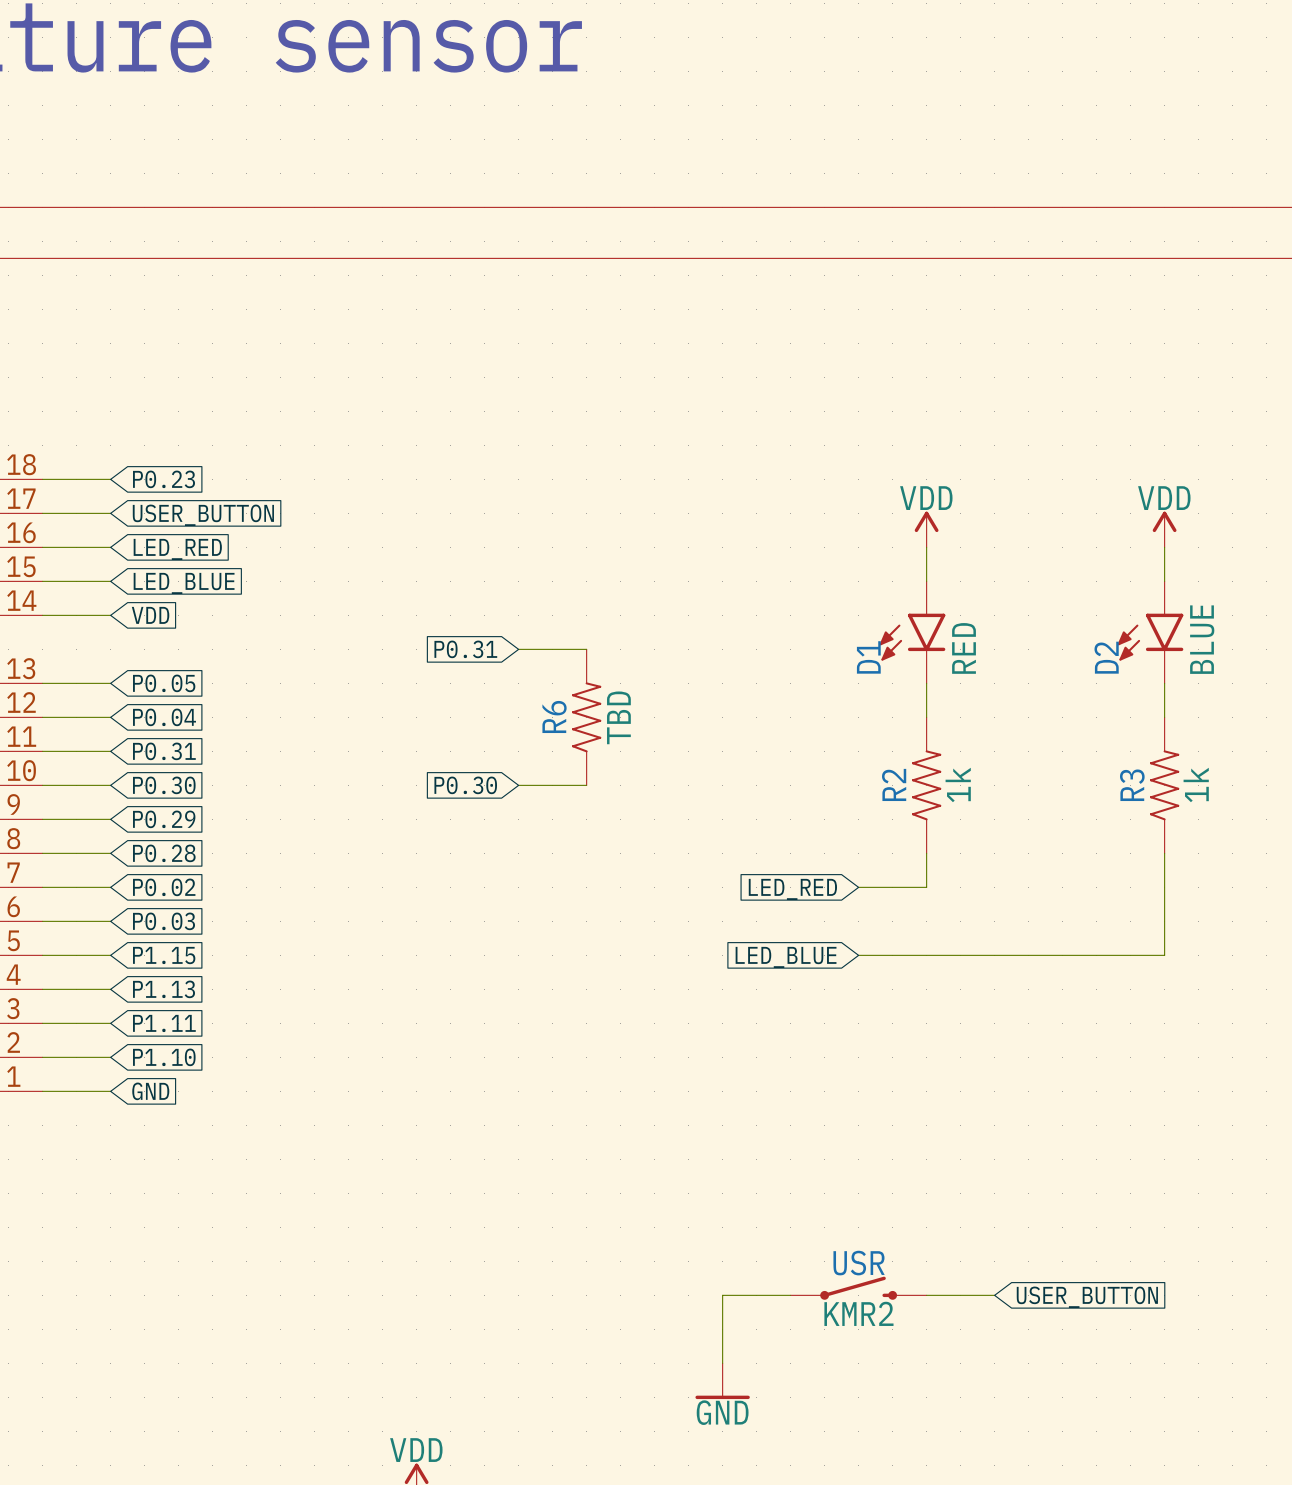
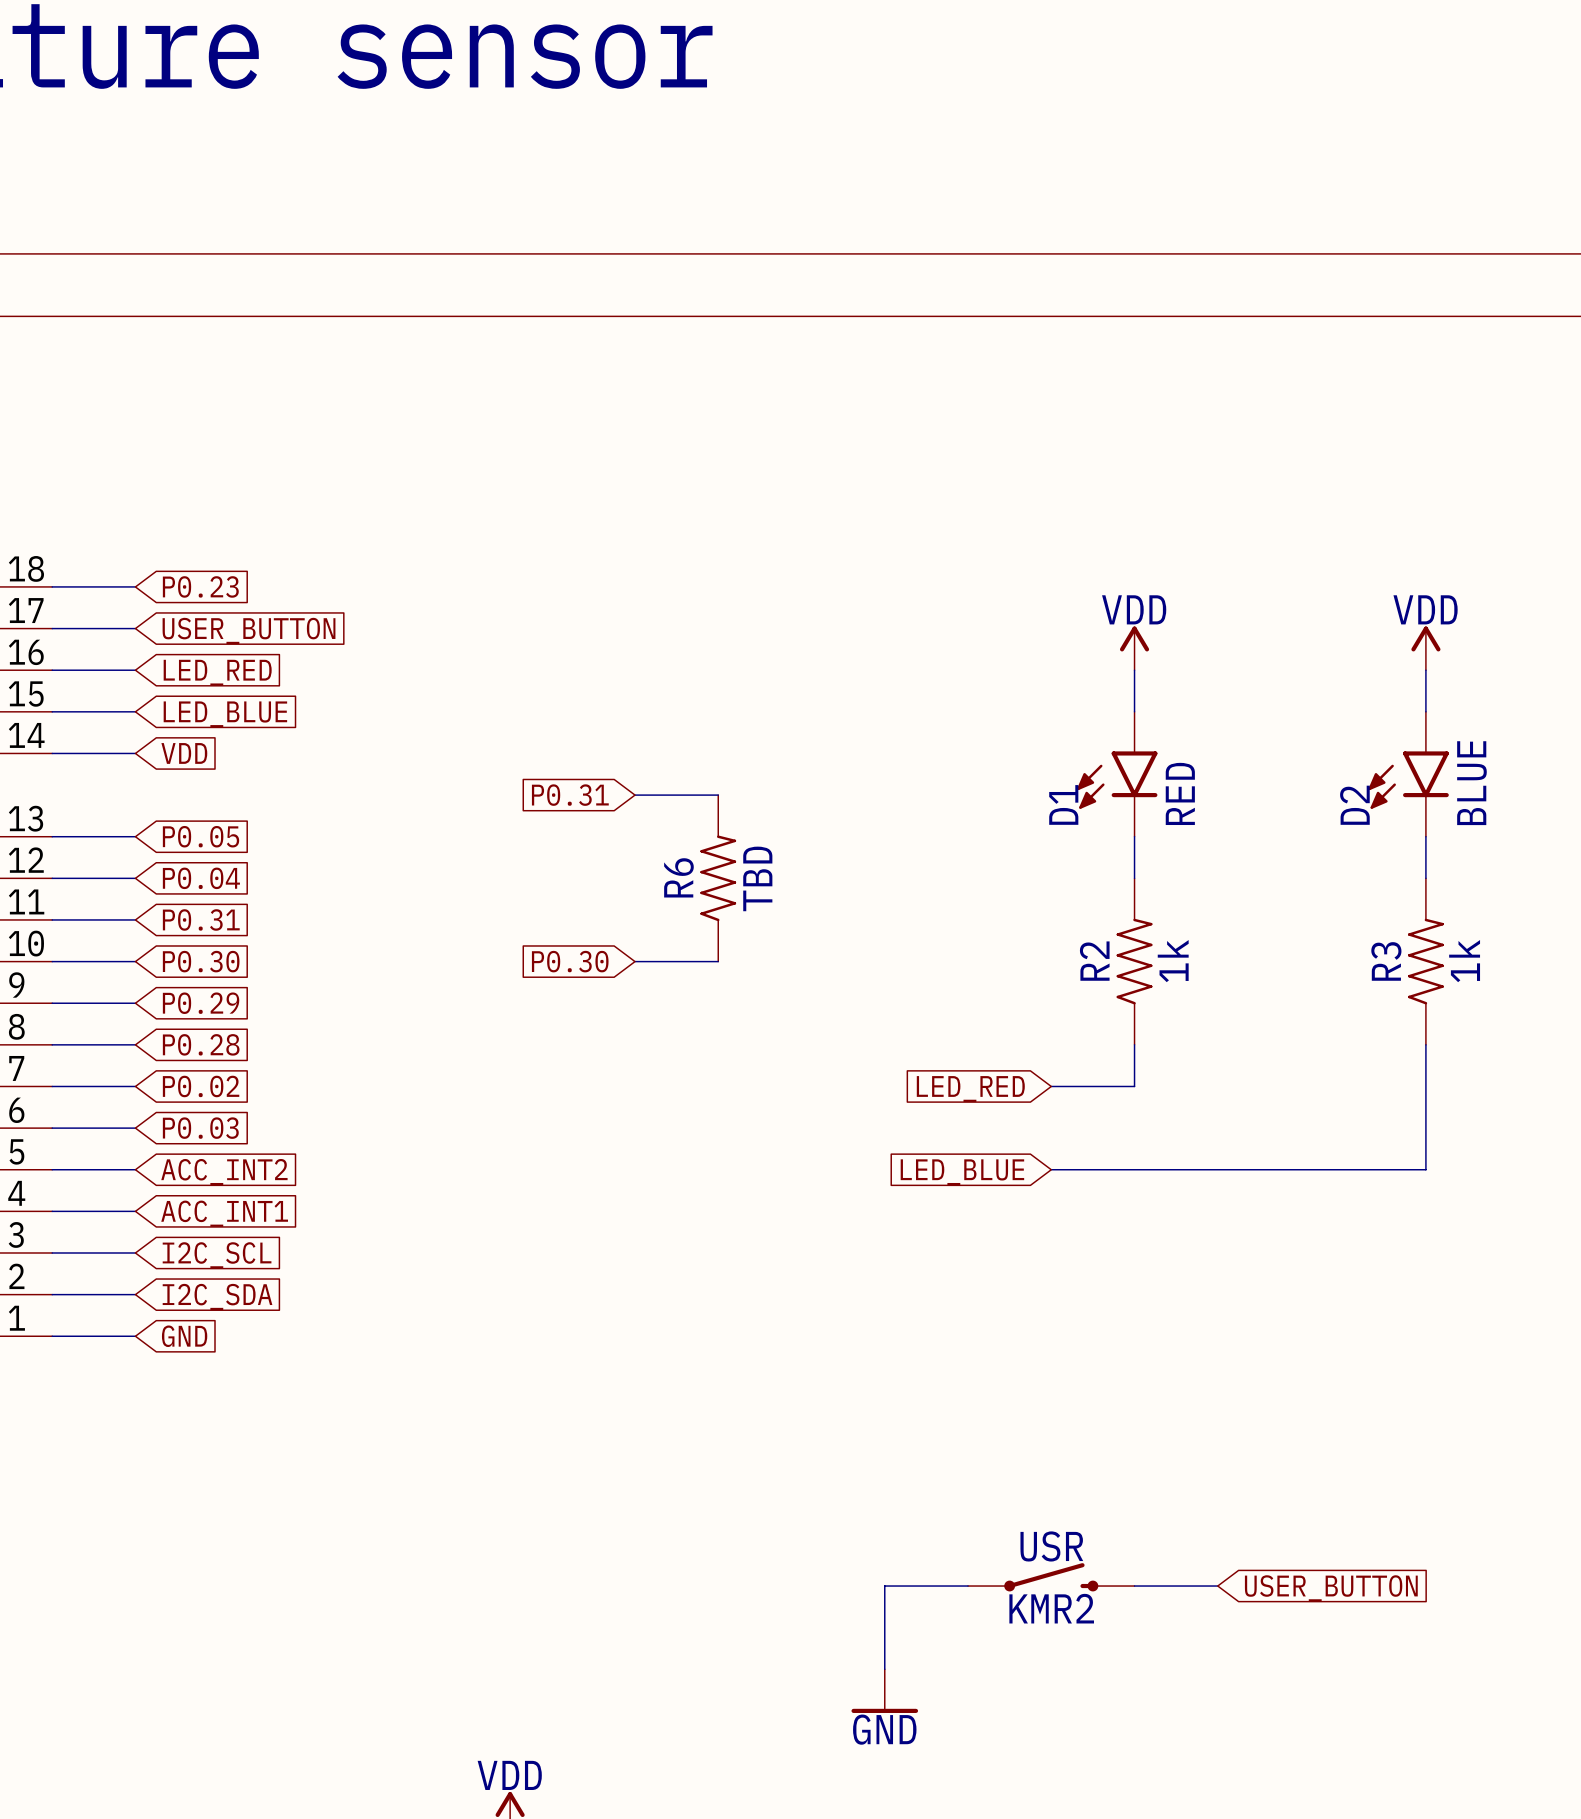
global label: P1.15 (164, 955) -> ACC_INT2 (224, 1172)
global label: P1.13 (164, 989) -> ACC_INT1 (224, 1213)
global label: P1.11 (164, 1023) -> I2C_SCL (217, 1255)
global label: P1.10 (164, 1057) -> I2C_SDA (217, 1296)

